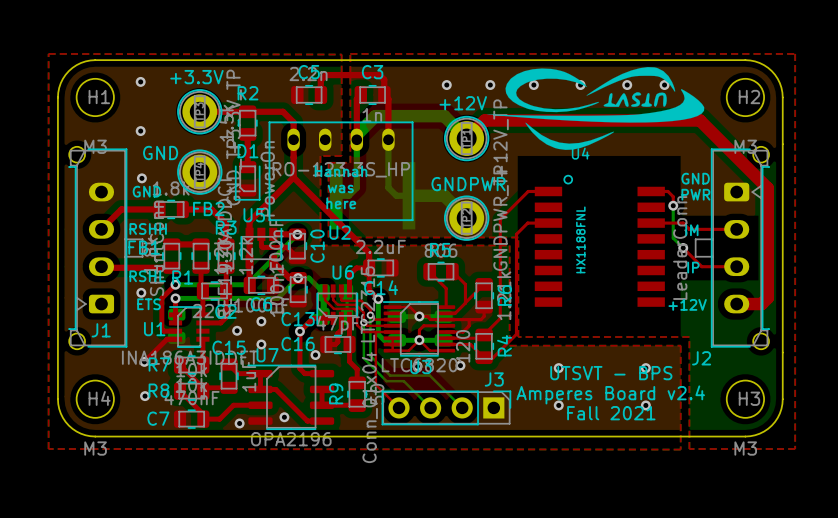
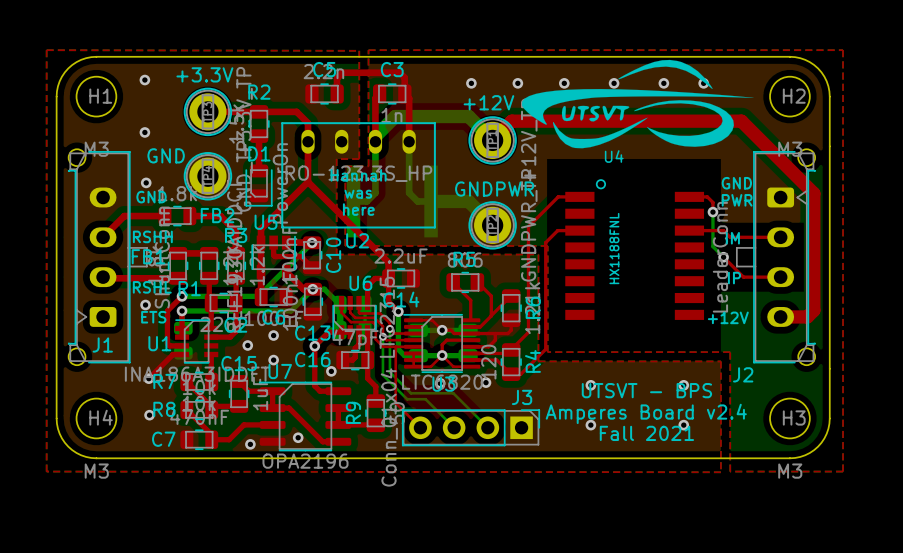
drawing shape: [486, 67, 705, 150] -> [521, 59, 754, 149]

